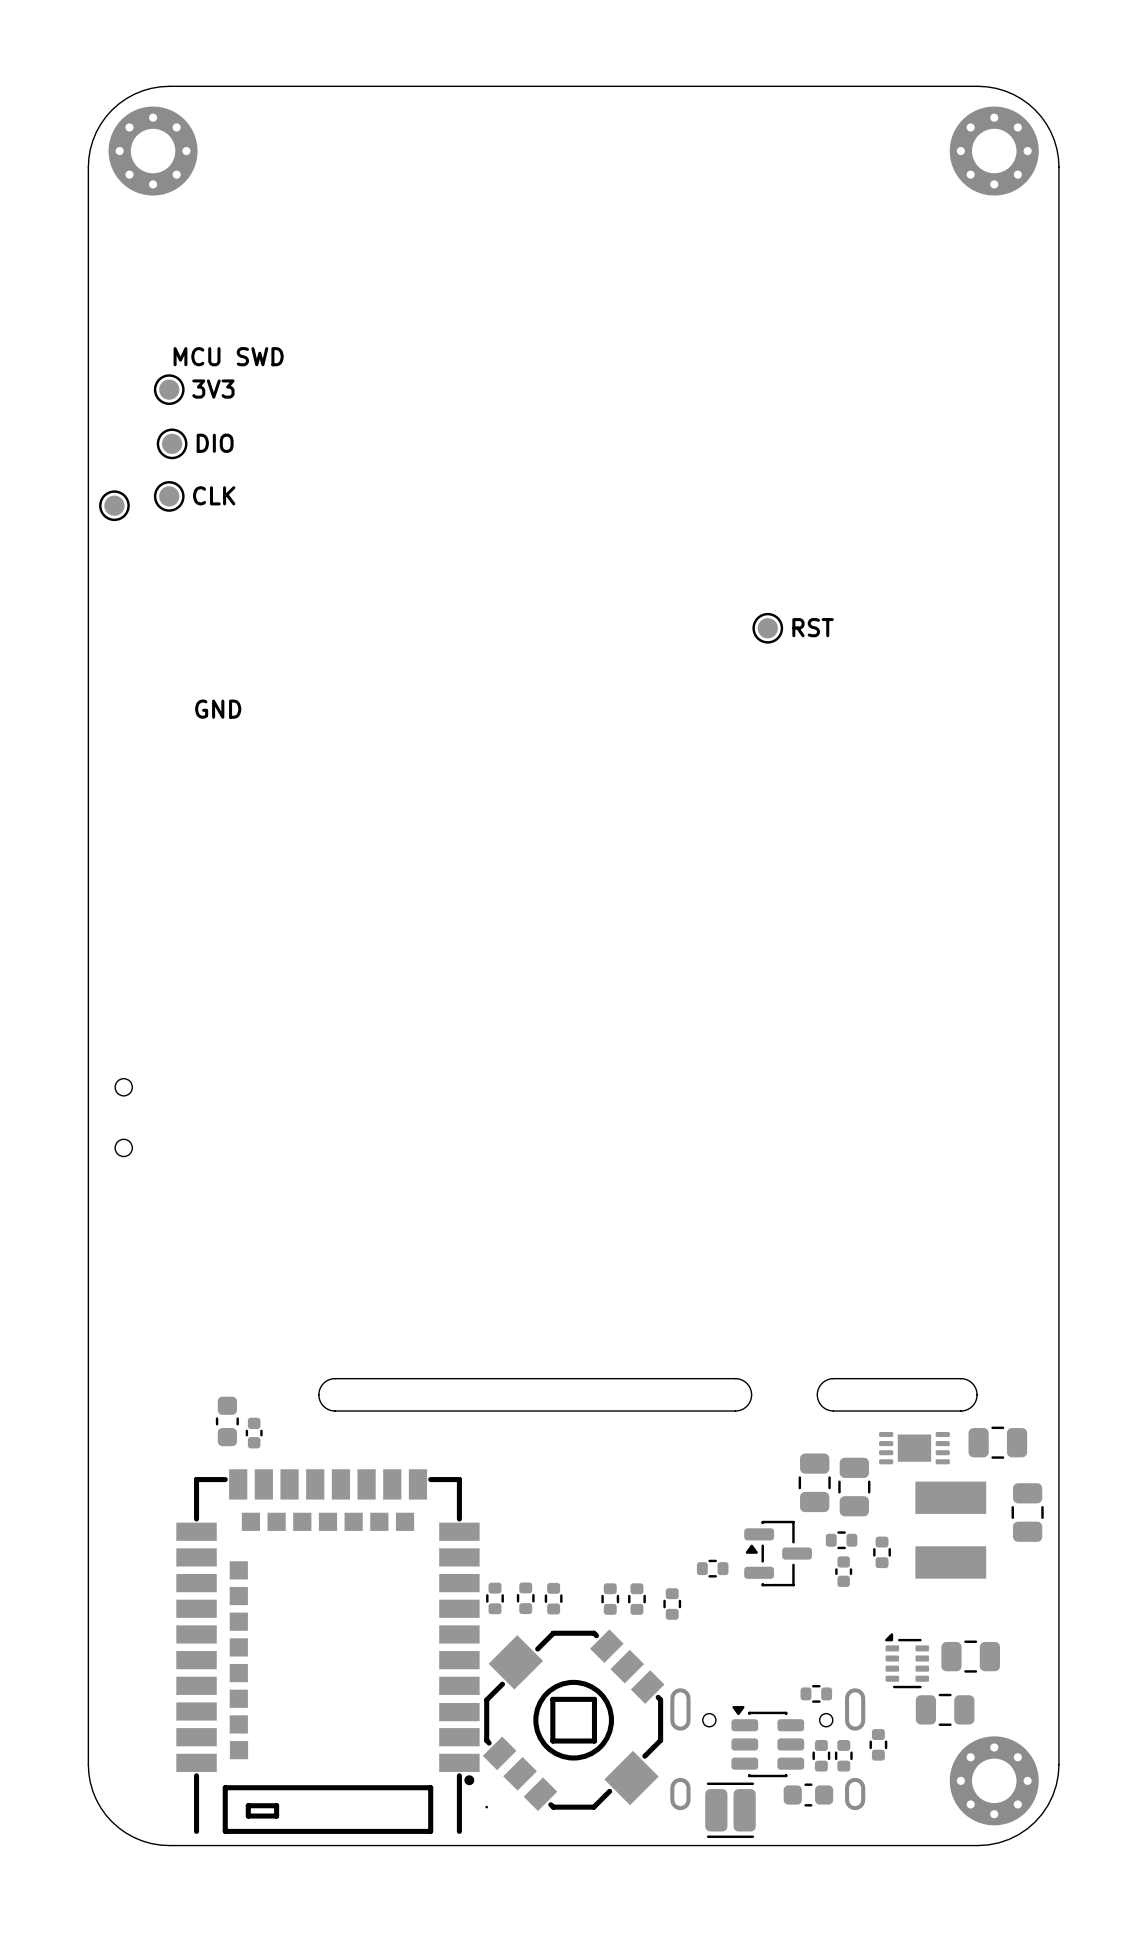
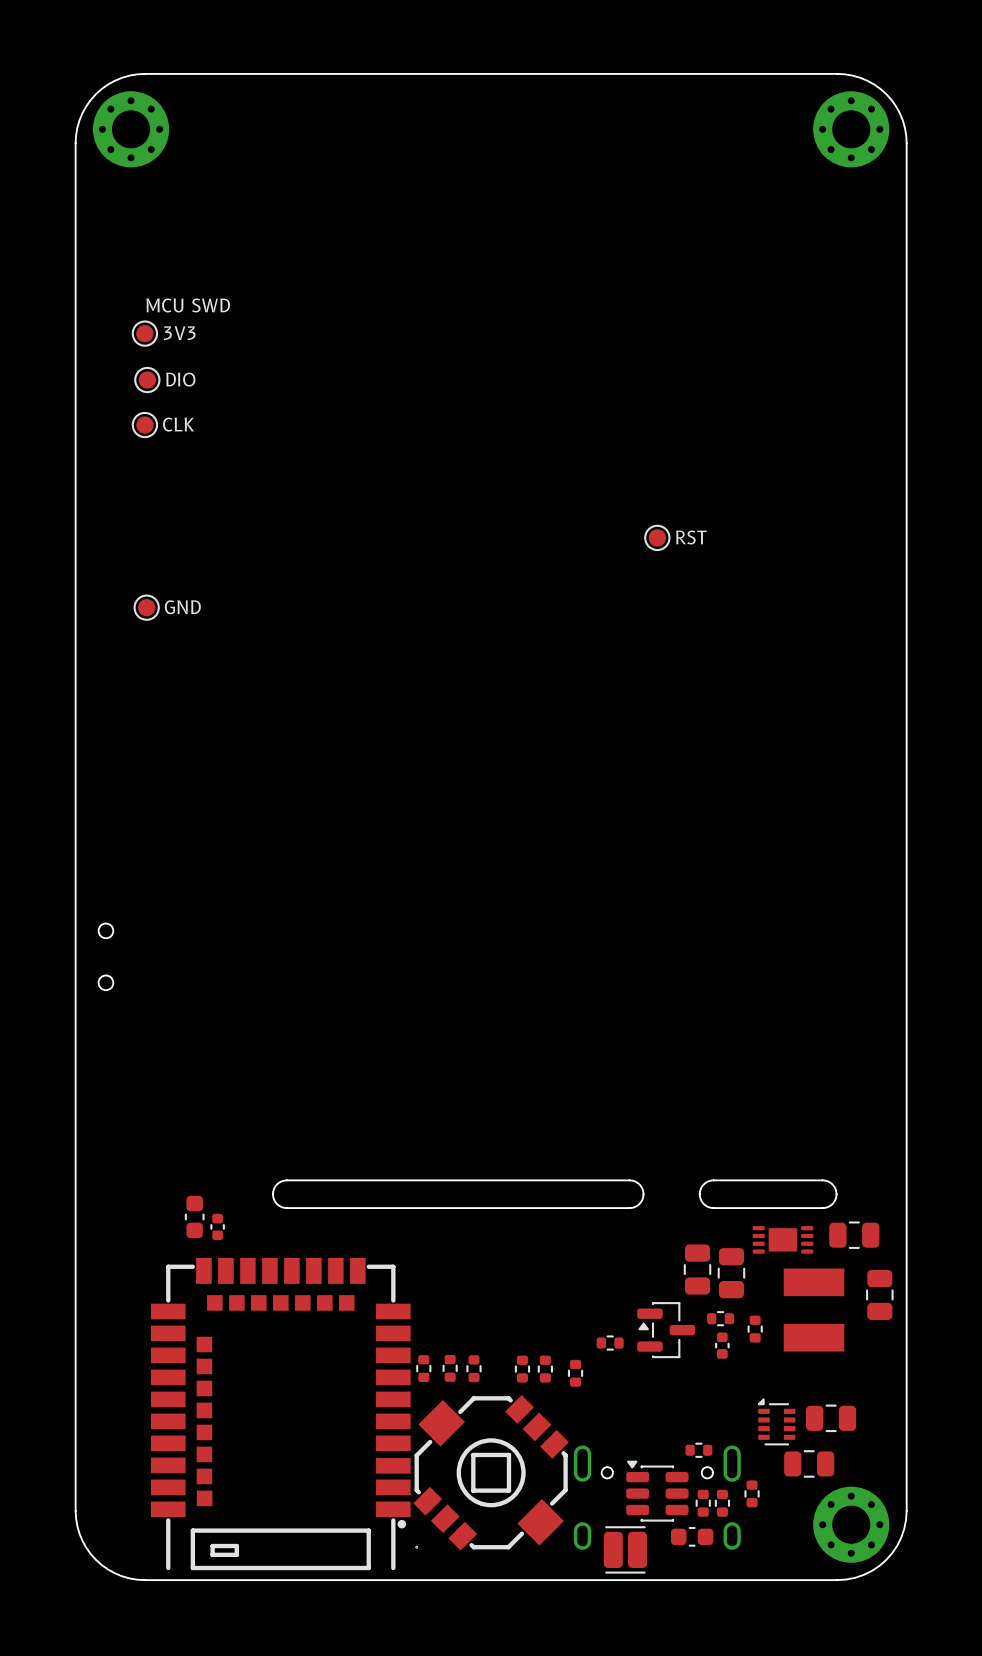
part position: (114, 505) -> (146, 607)

